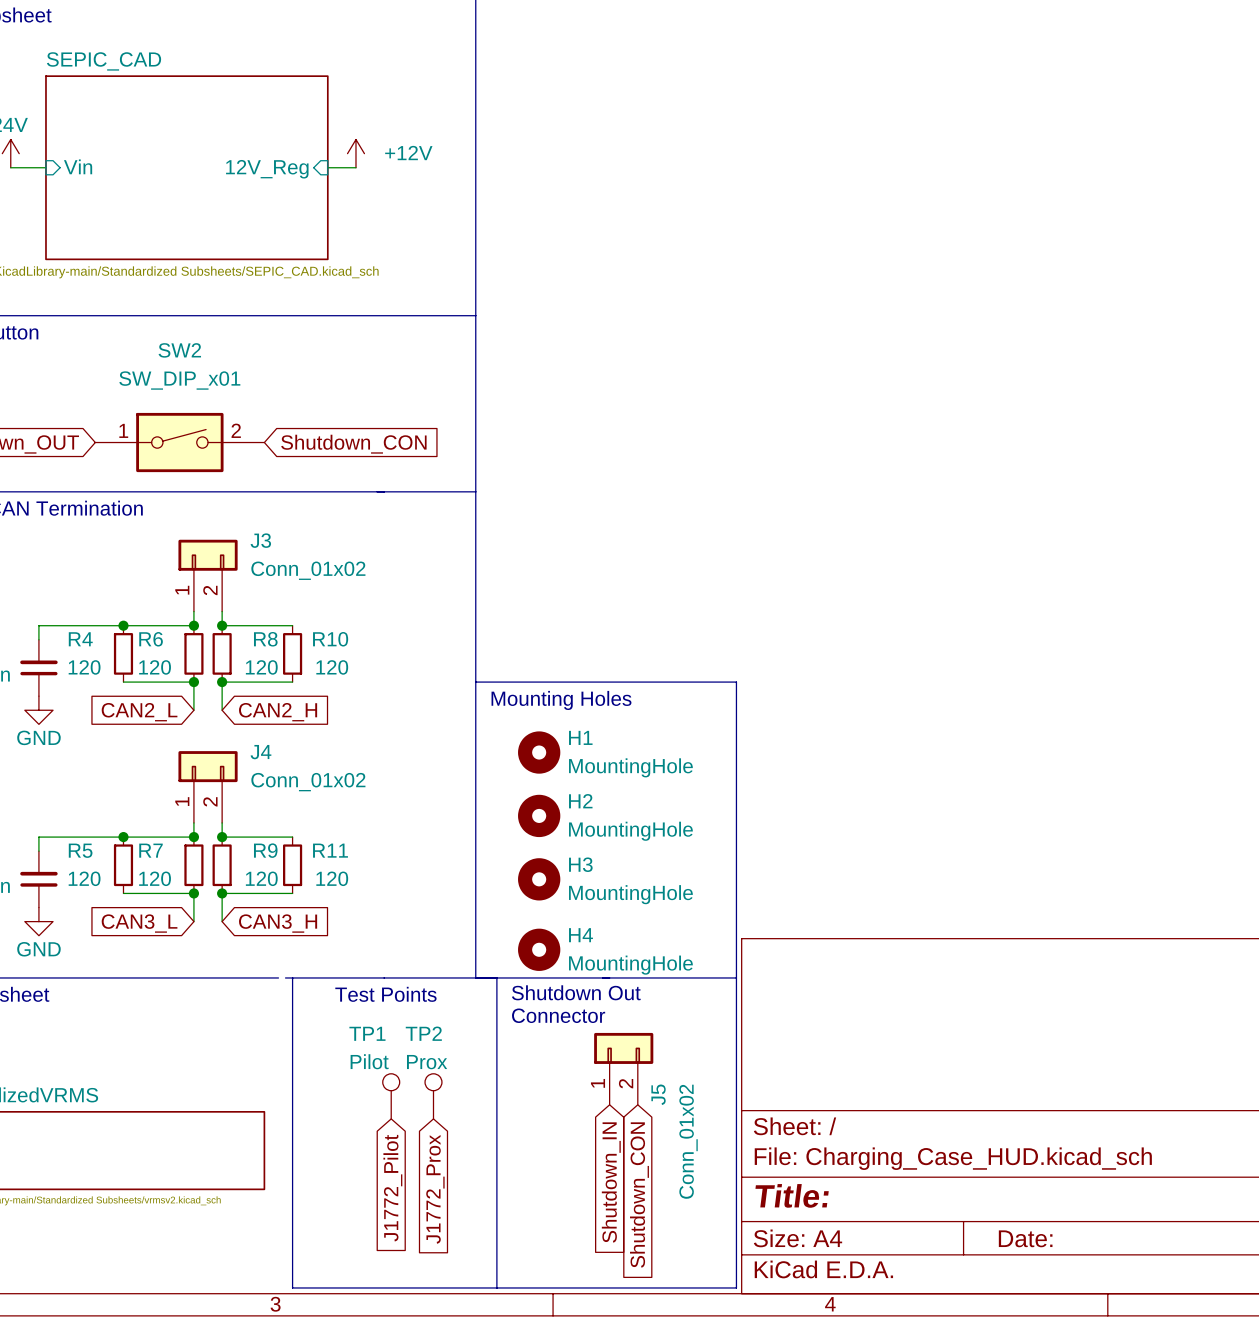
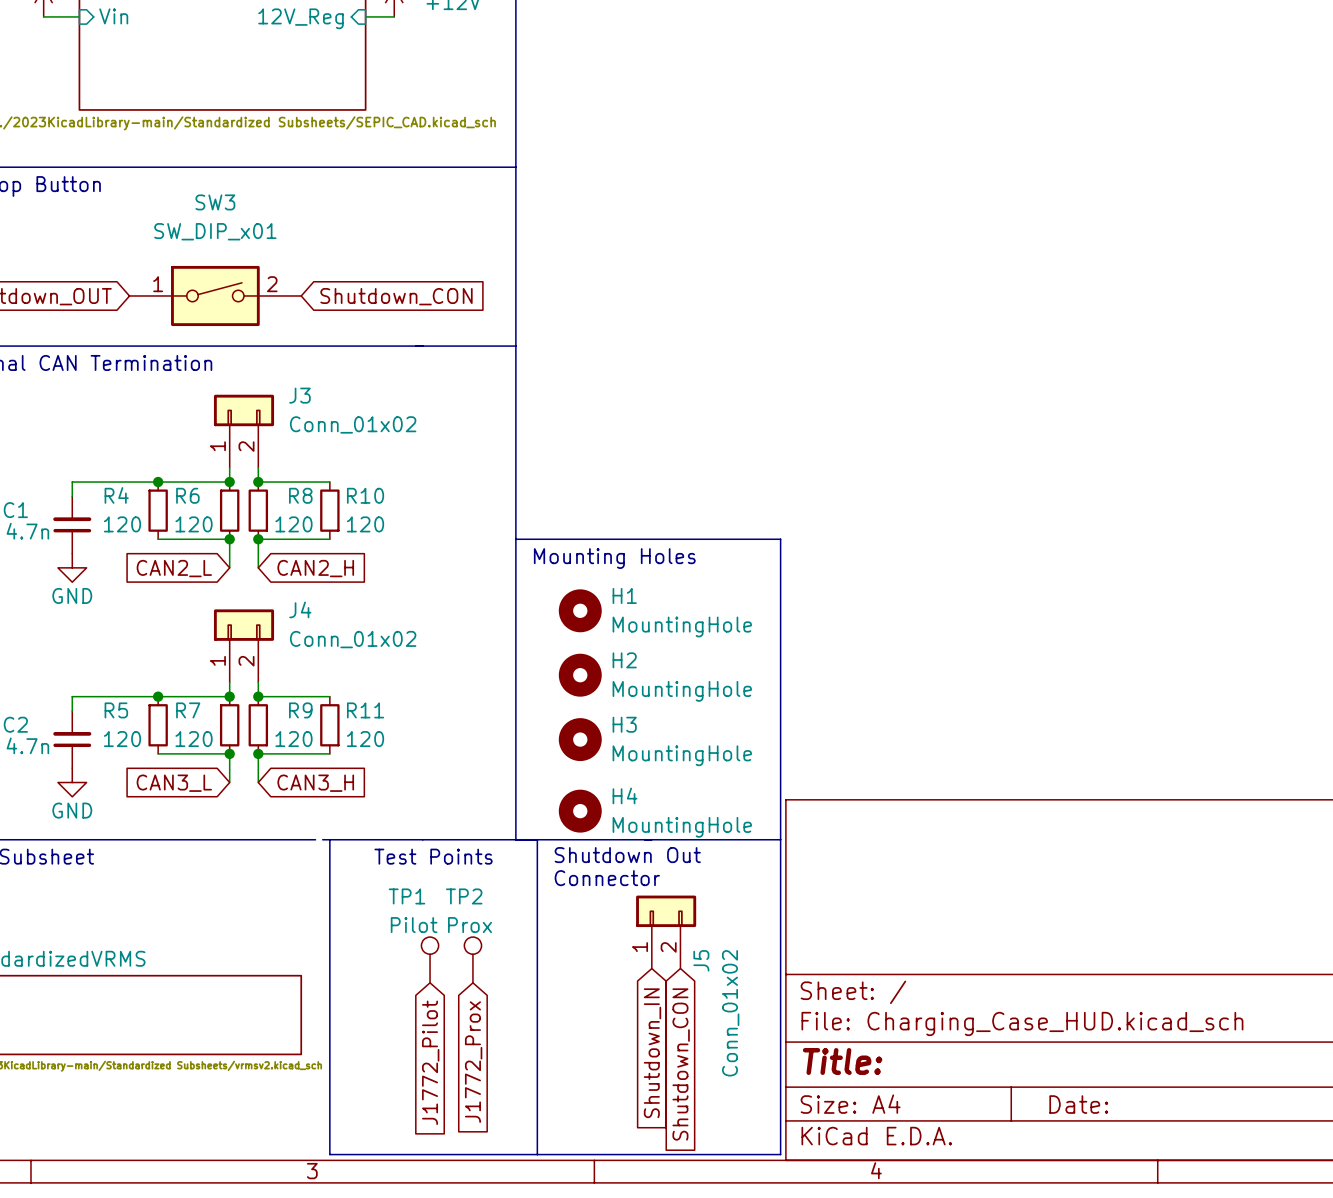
SW2 name: SW2 (179, 350) -> SW3 (215, 202)

